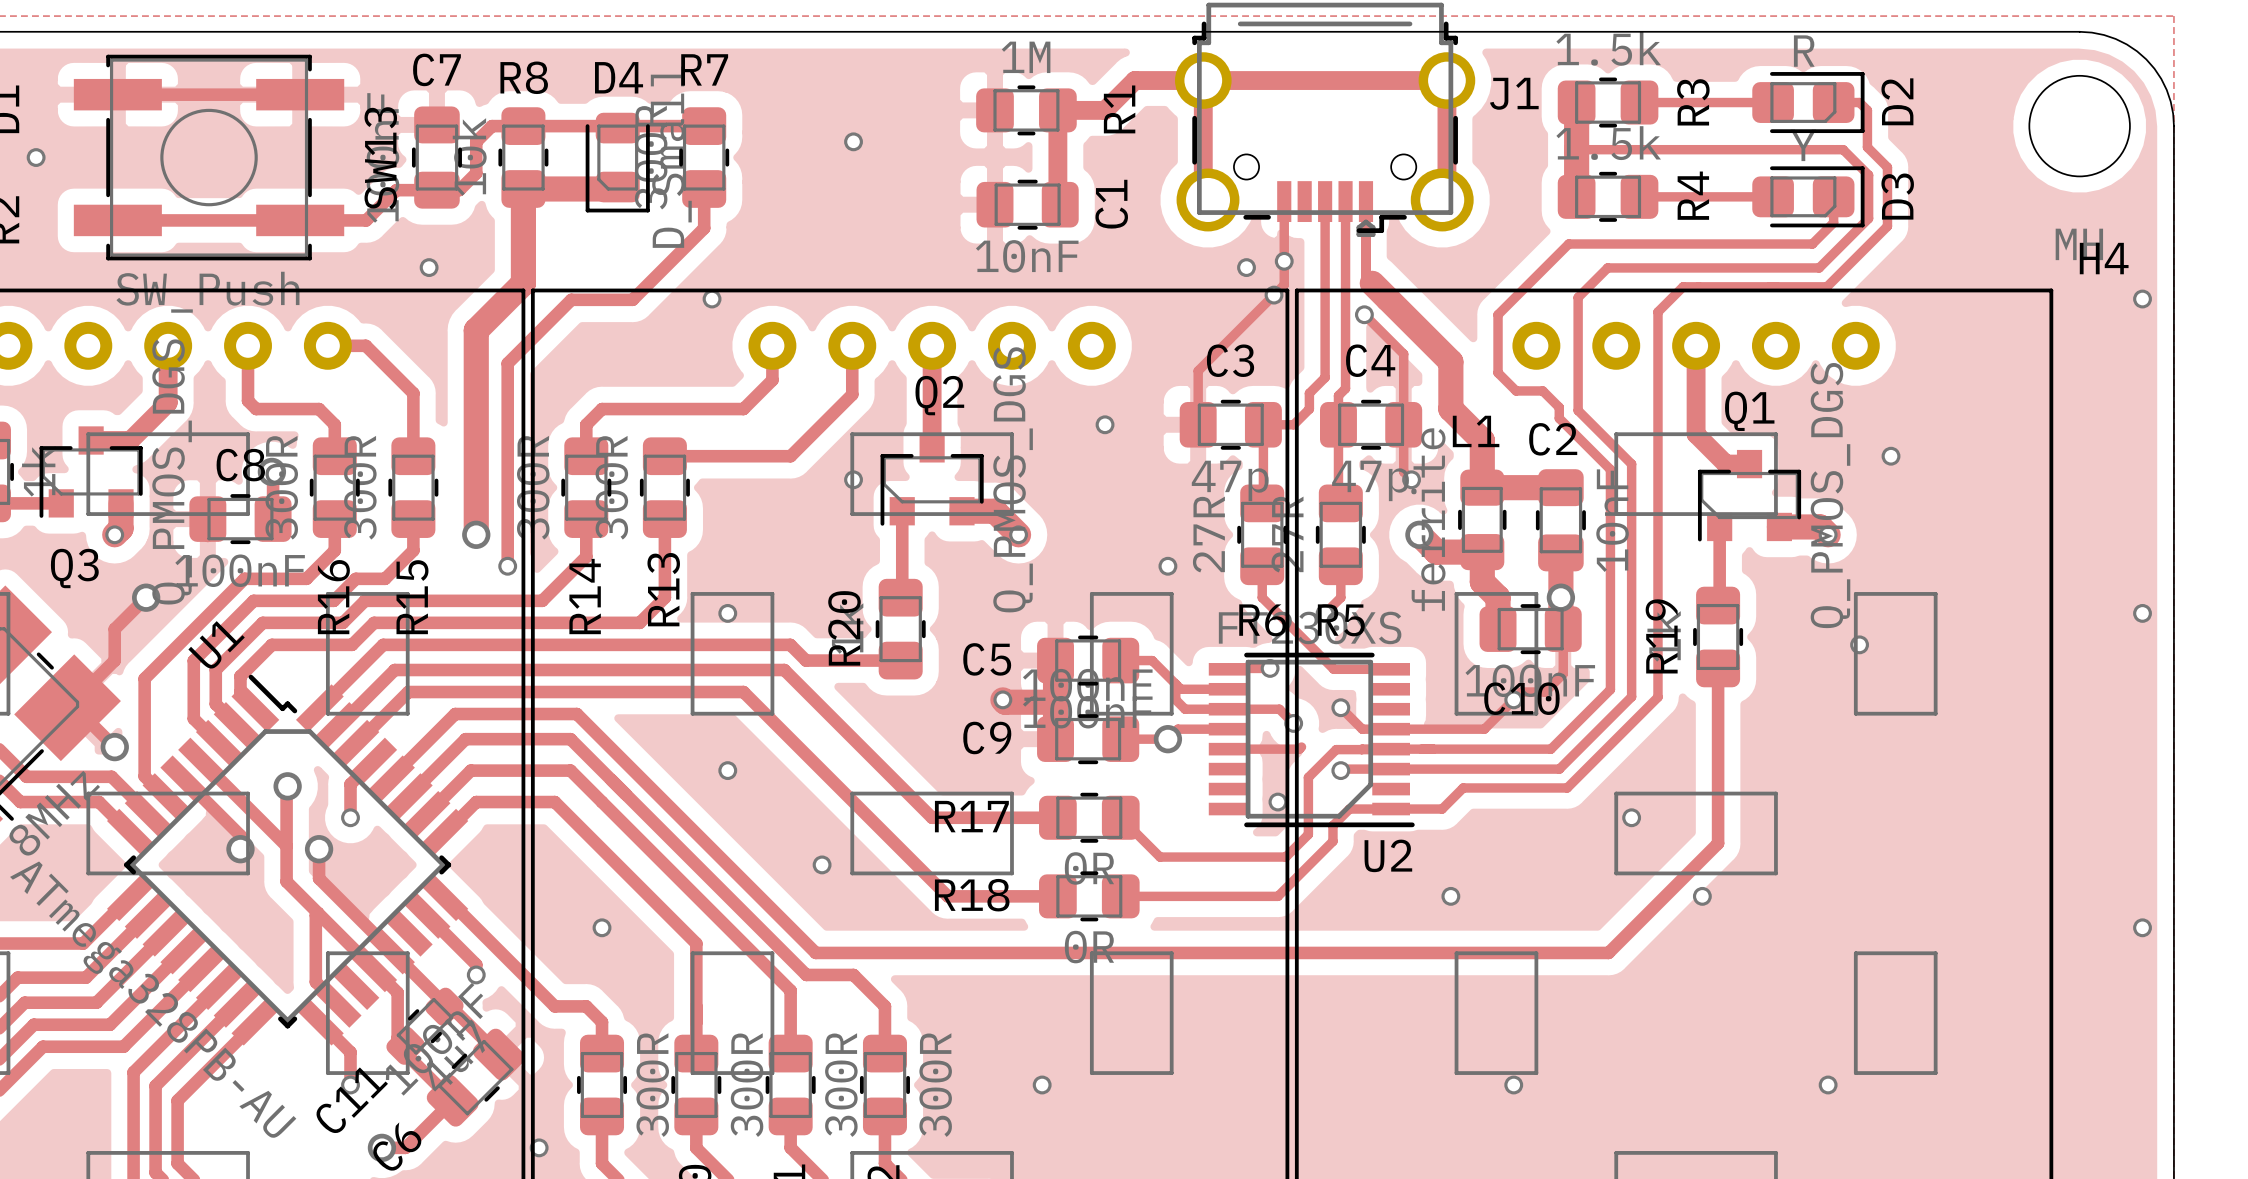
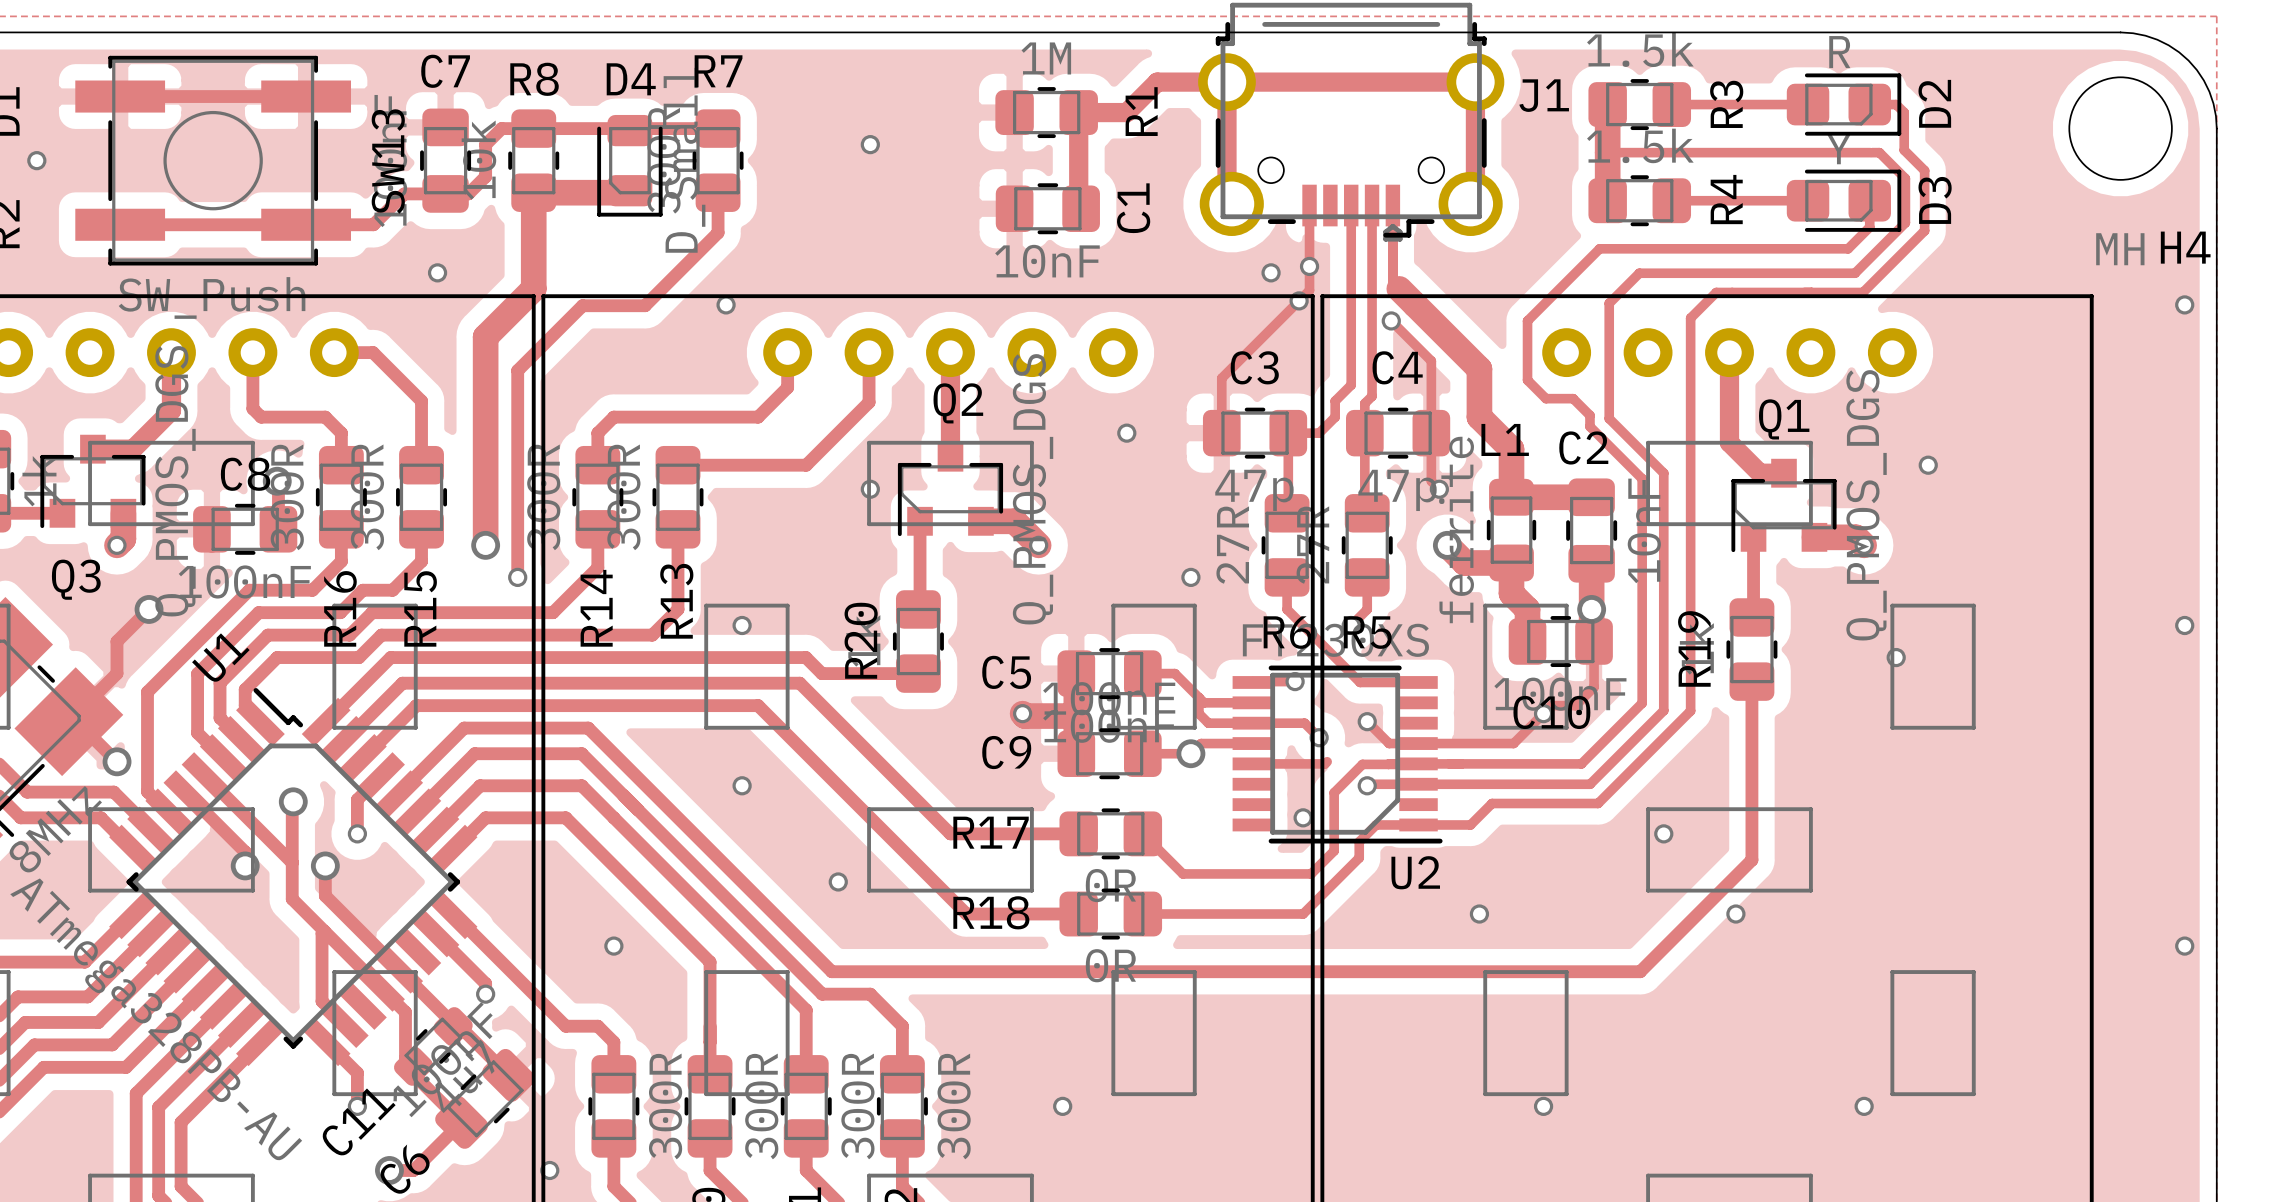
H4 name position: H4 (2104, 258) -> H4 (2185, 247)

